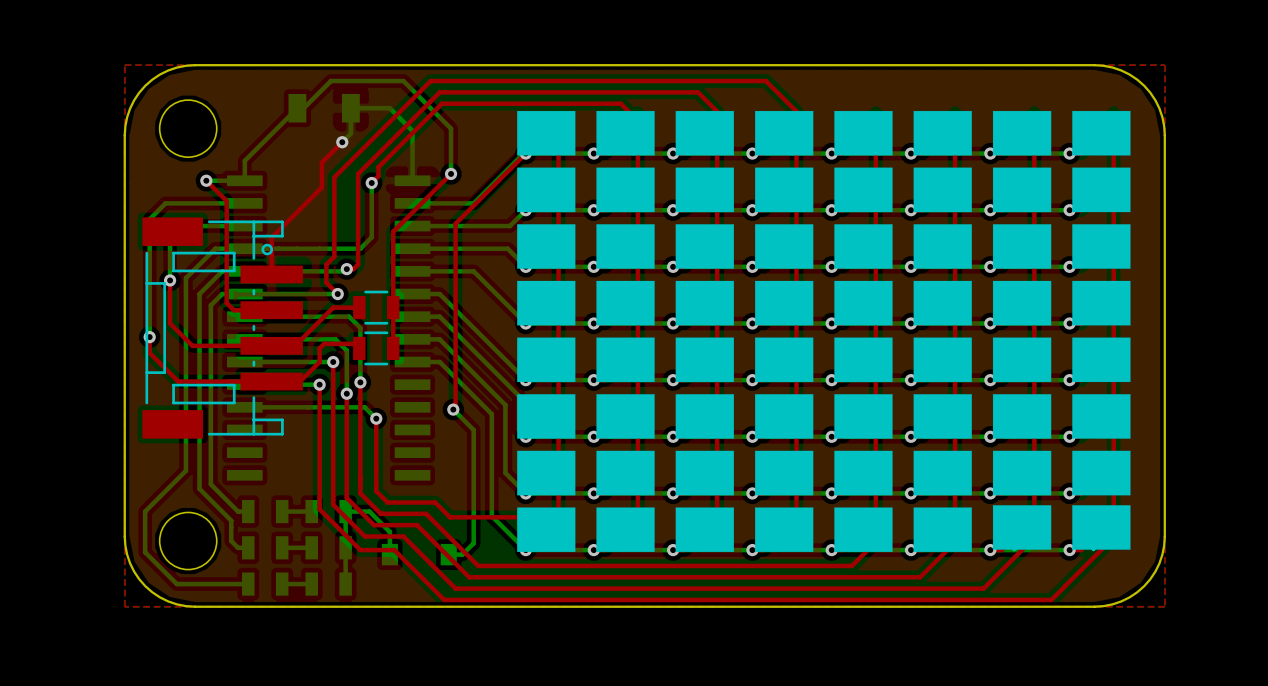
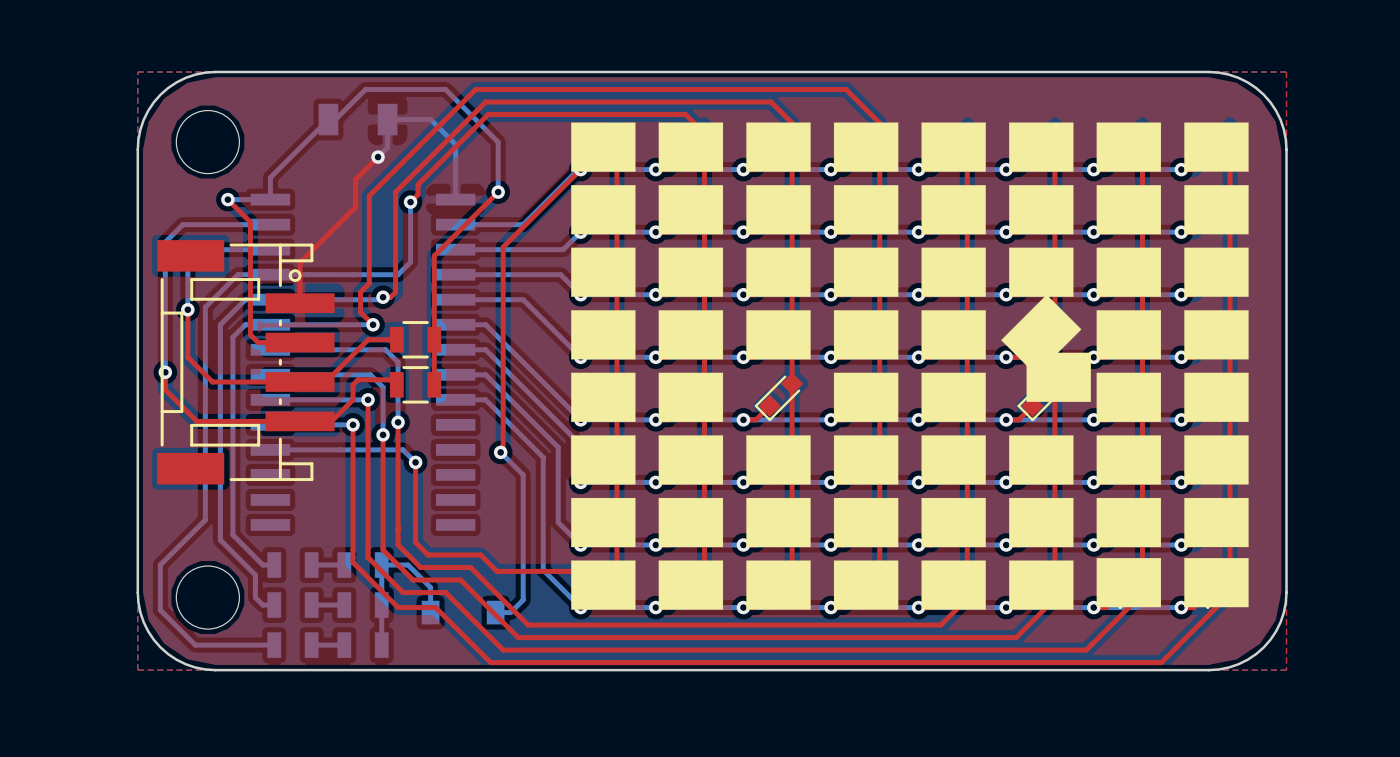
drawing shape: [913, 280, 972, 326] -> [1001, 294, 1082, 375]
drawing: none -> [1026, 352, 1091, 402]
drawing: [675, 337, 734, 383] -> none
drawing: [913, 337, 972, 383] -> none

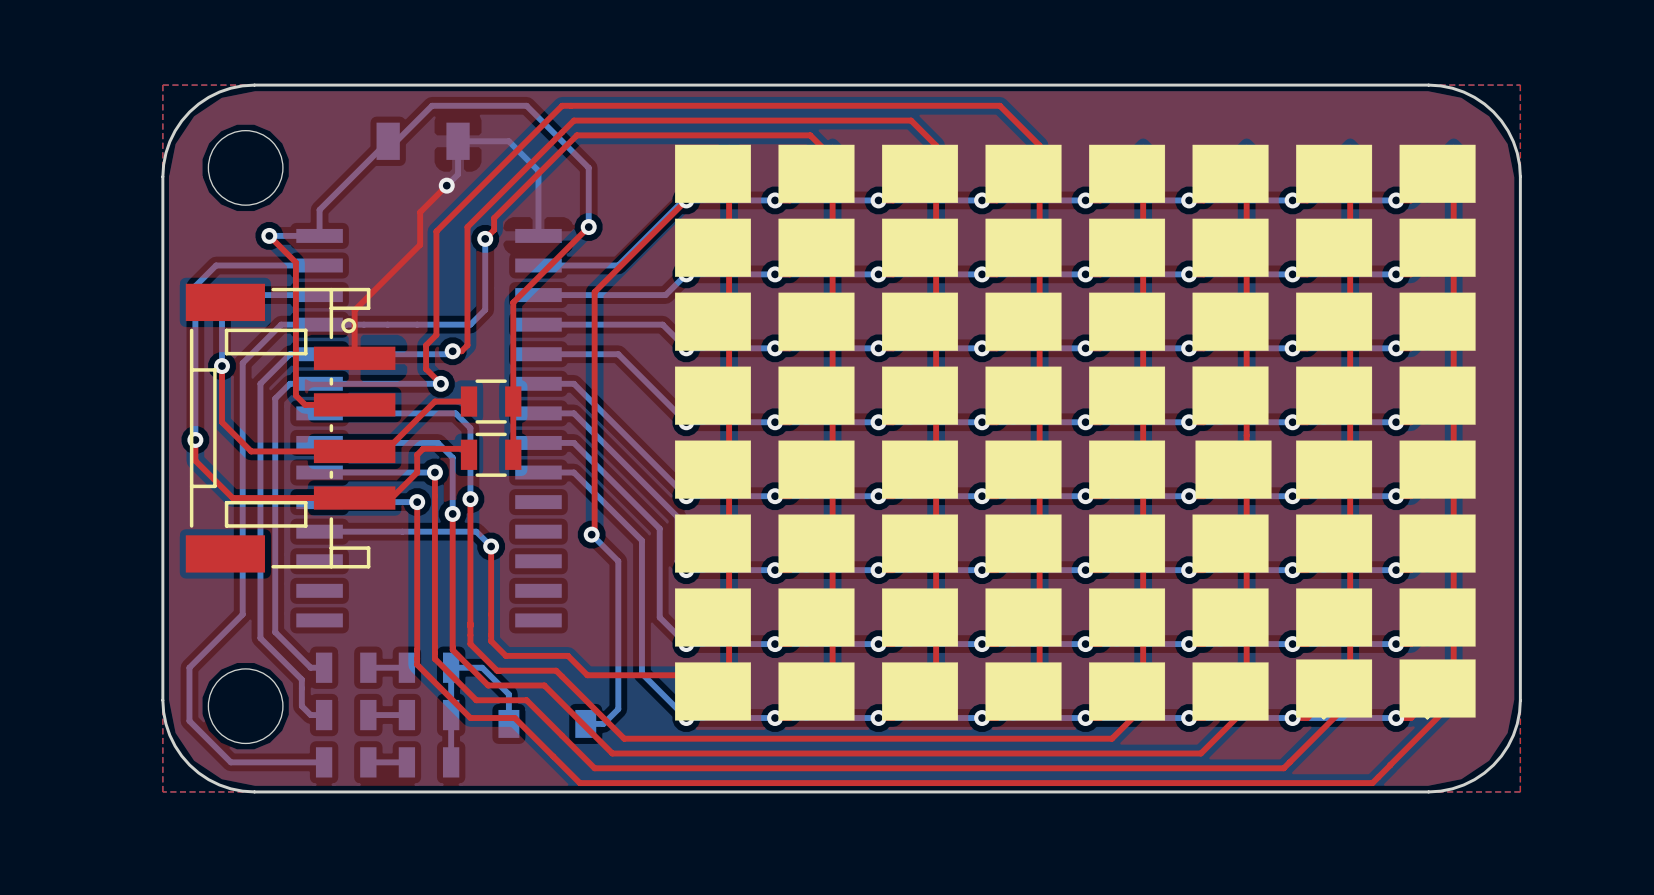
drawing shape: [1001, 294, 1082, 375] -> [1192, 366, 1269, 425]
drawing: [1026, 352, 1091, 402] -> none
drawing: none -> [882, 440, 959, 499]
drawing: none -> [1195, 440, 1272, 499]

